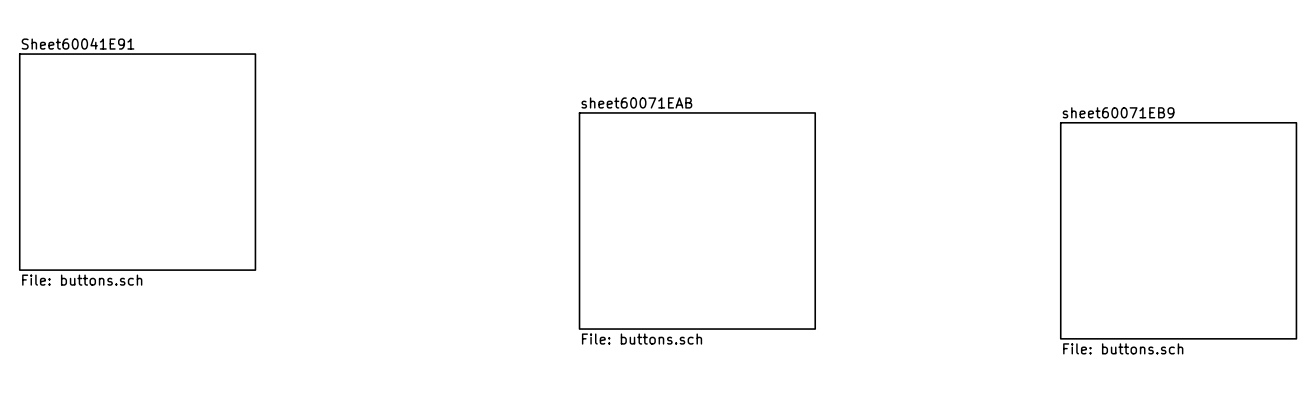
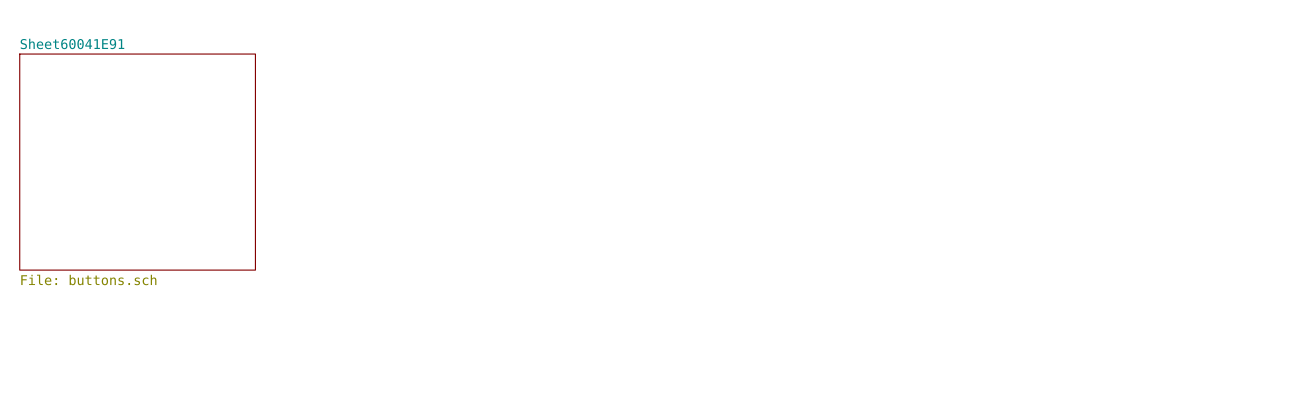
sheet sheet60071EAB: File: buttons.sch (697, 220) -> none
sheet sheet60071EB9: File: buttons.sch (1178, 230) -> none

